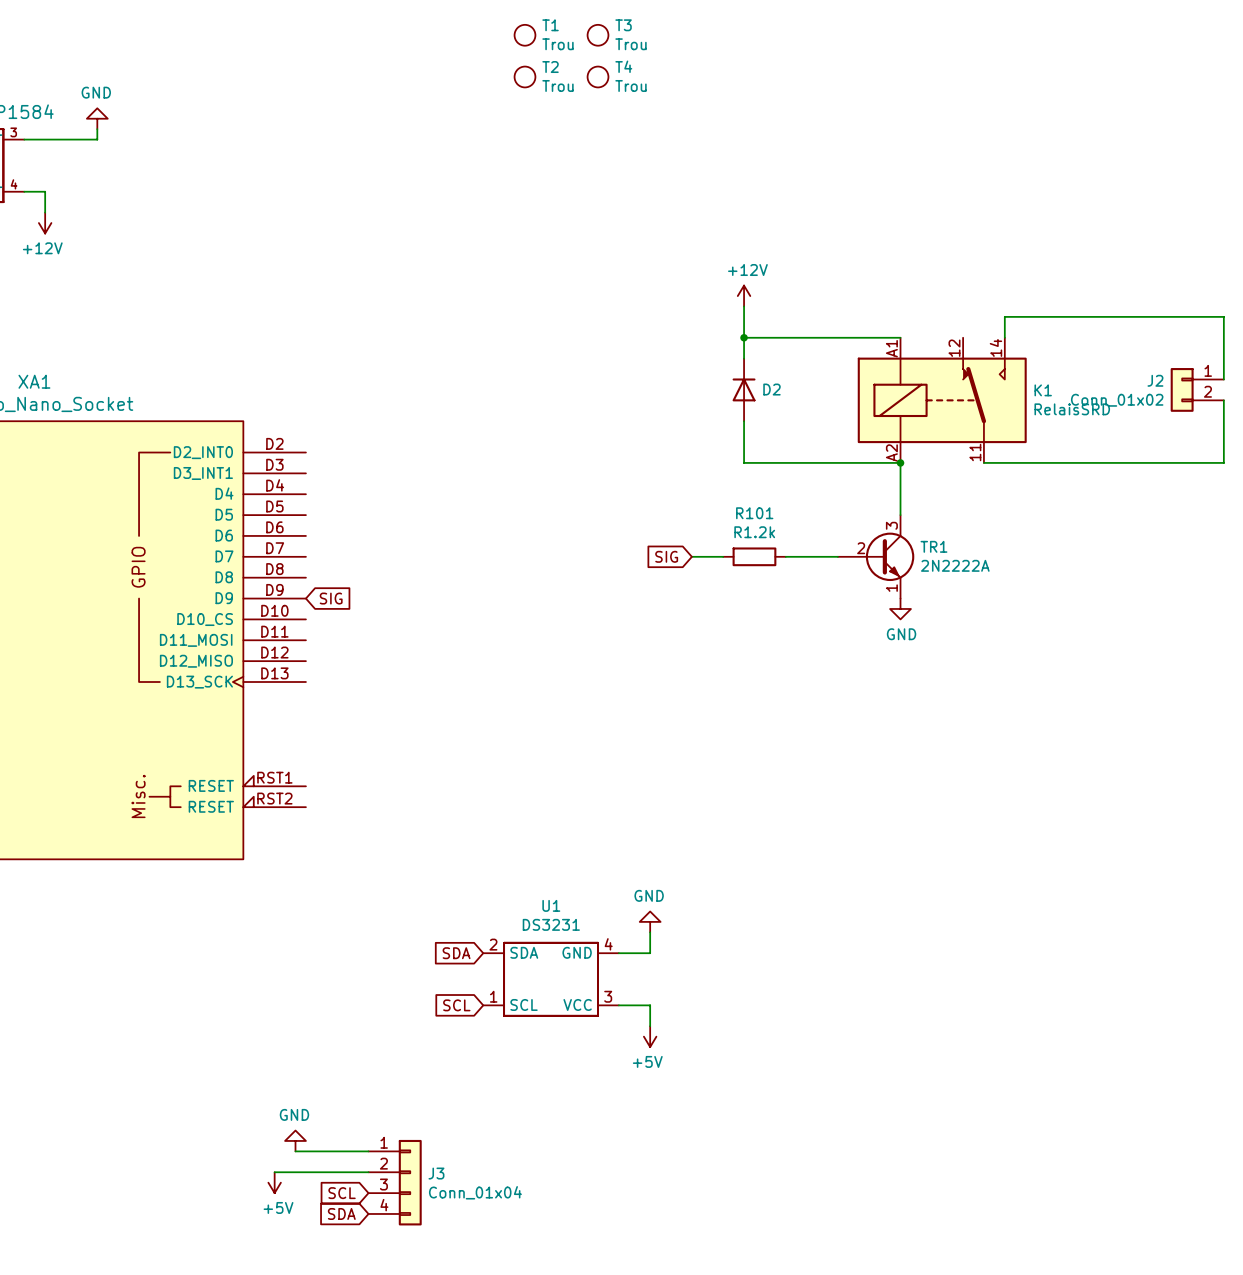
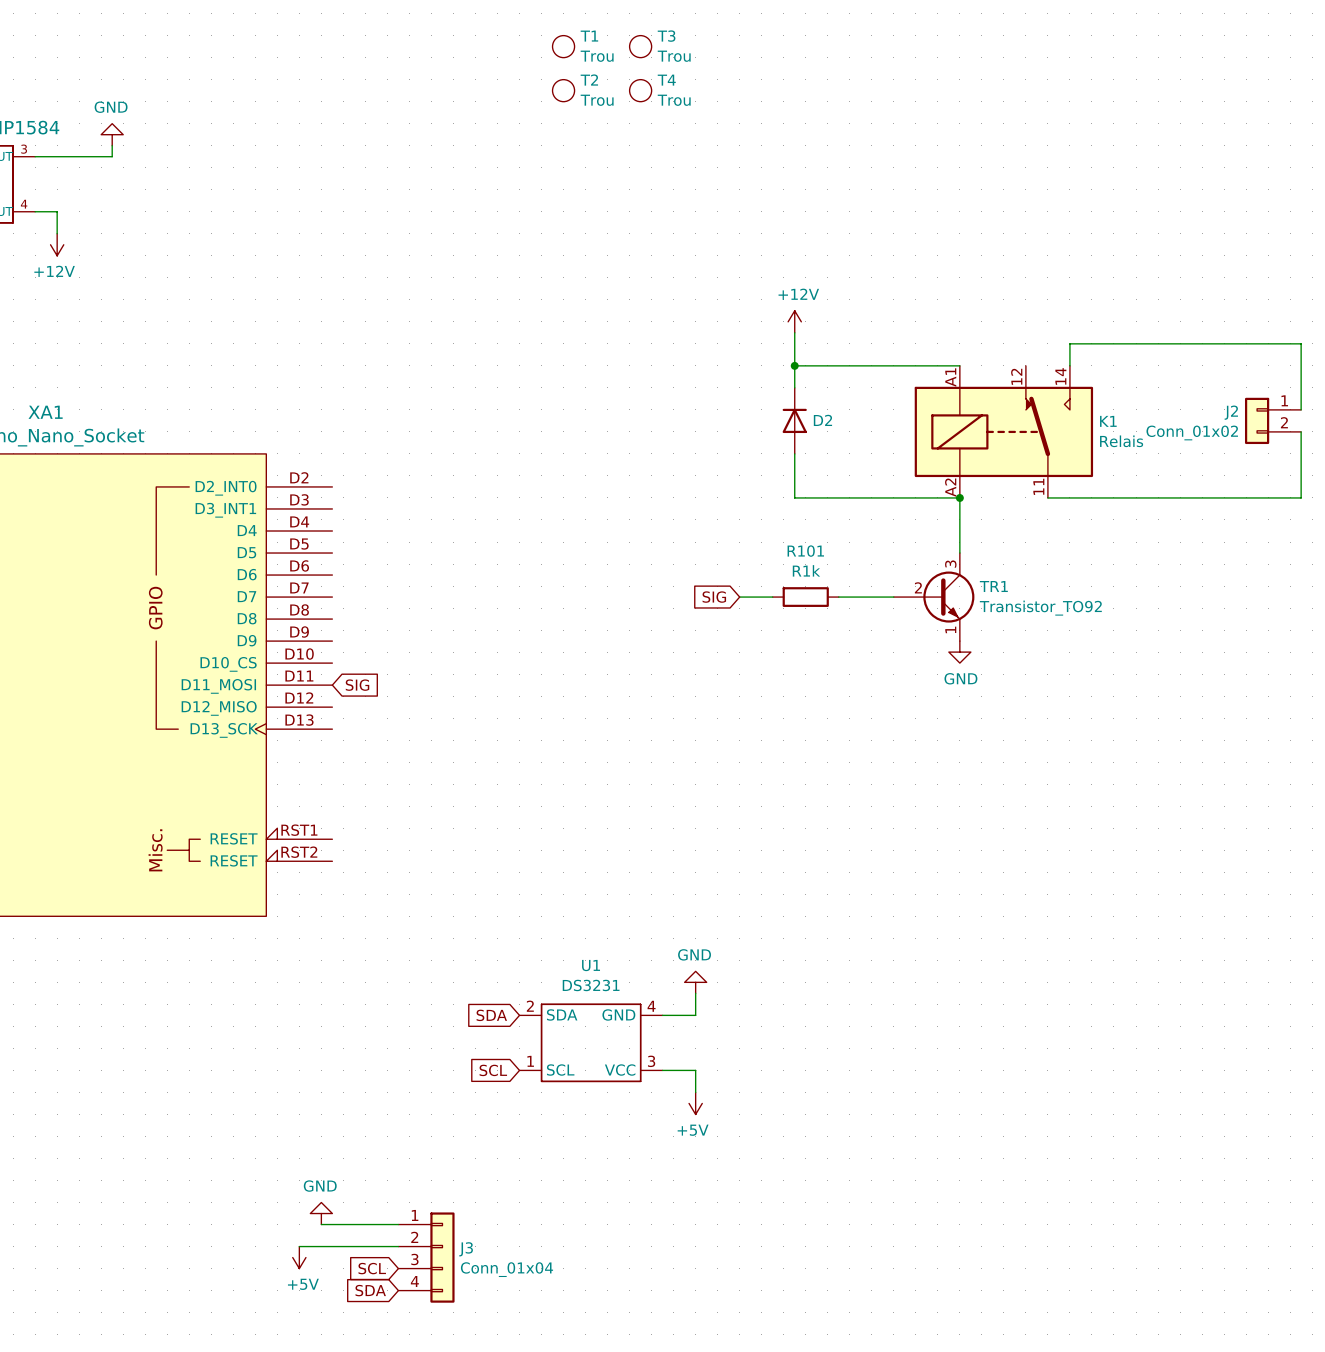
K1 value: RelaisSRD (1072, 409) -> Relais (1121, 441)
R101 value: R1.2k (754, 532) -> R1k (806, 570)
TR1 value: 2N2222A (955, 565) -> Transistor_TO92 (1040, 608)
global label position: SIG (331, 598) -> SIG (357, 685)

